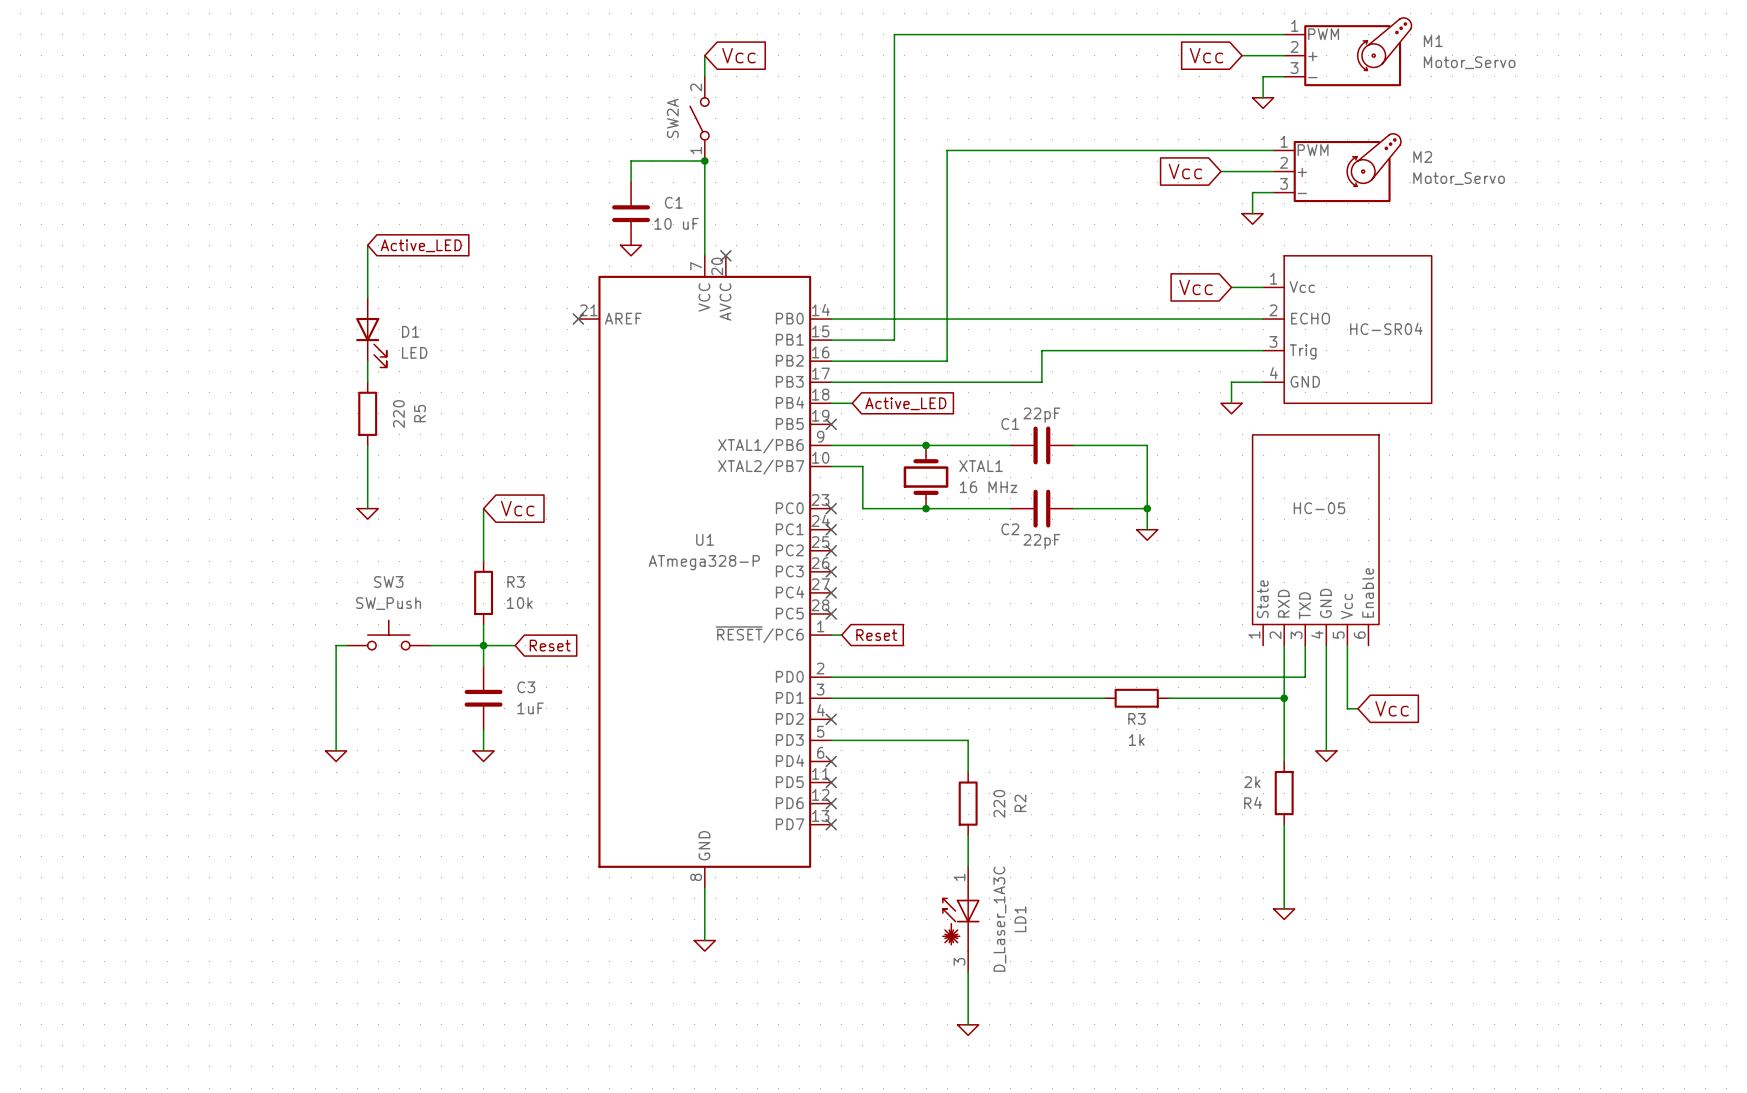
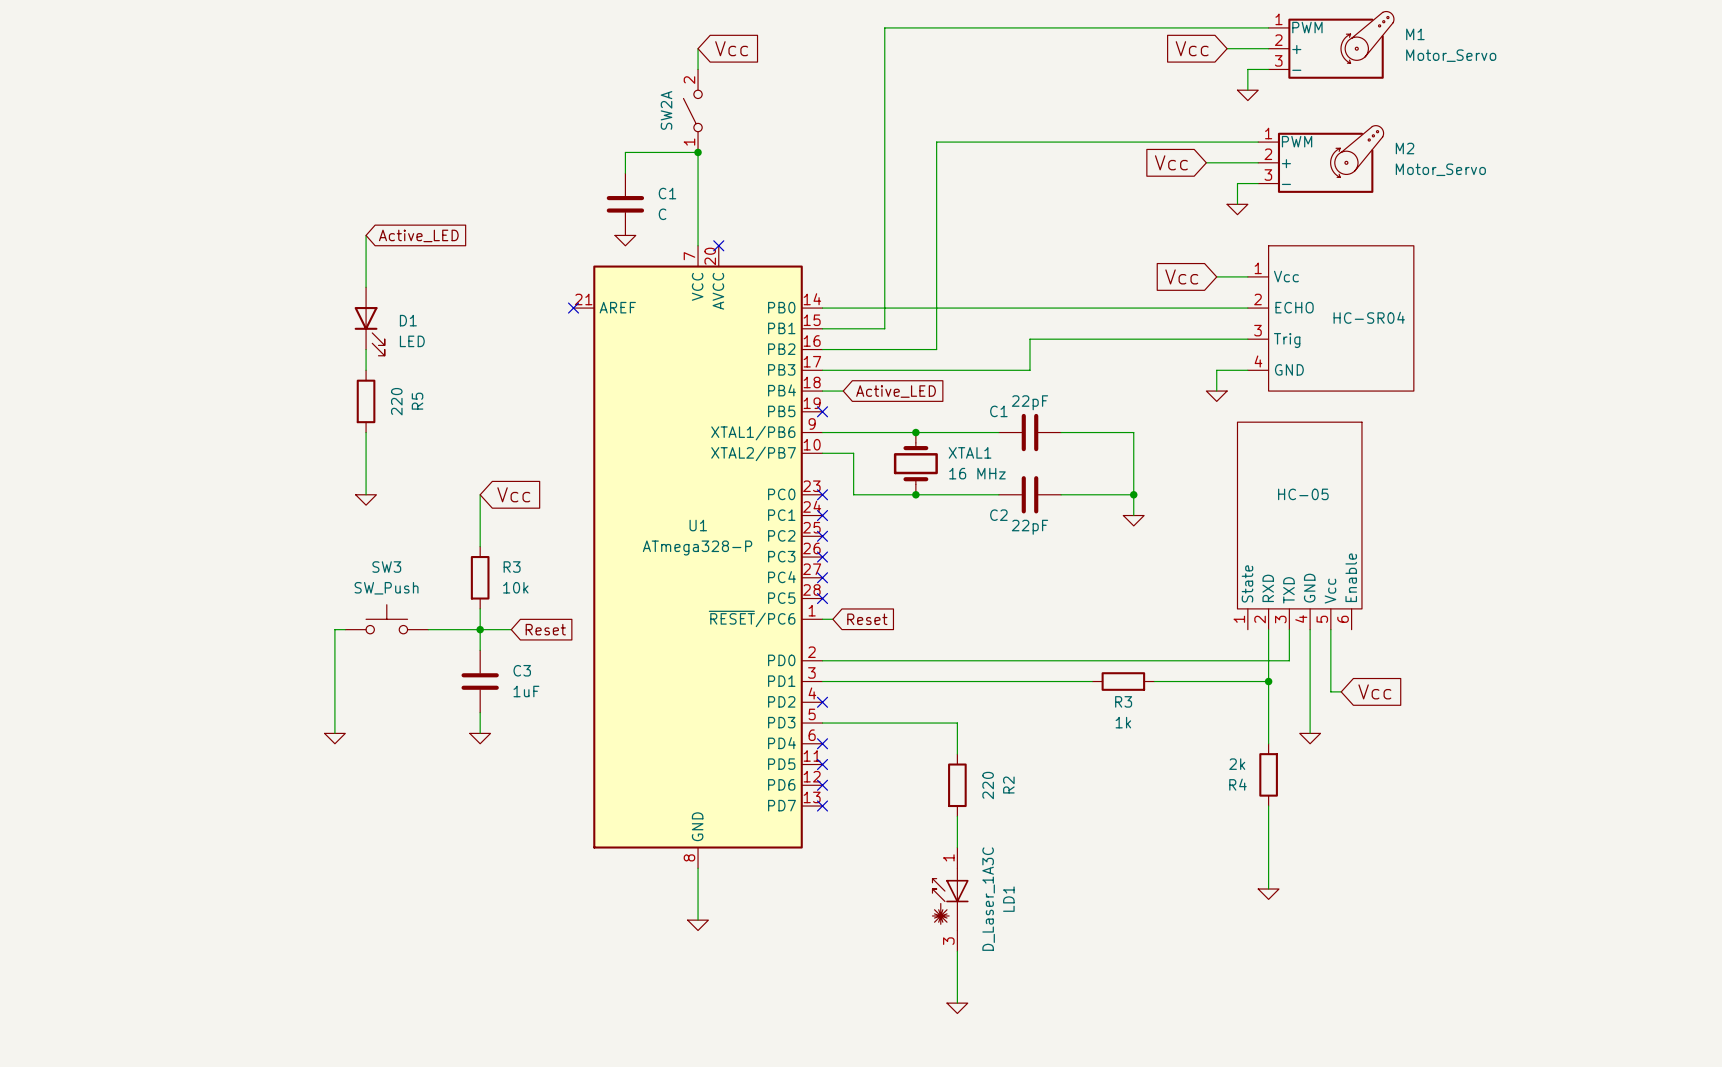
C1 value: 10 uF (676, 223) -> C (662, 214)

